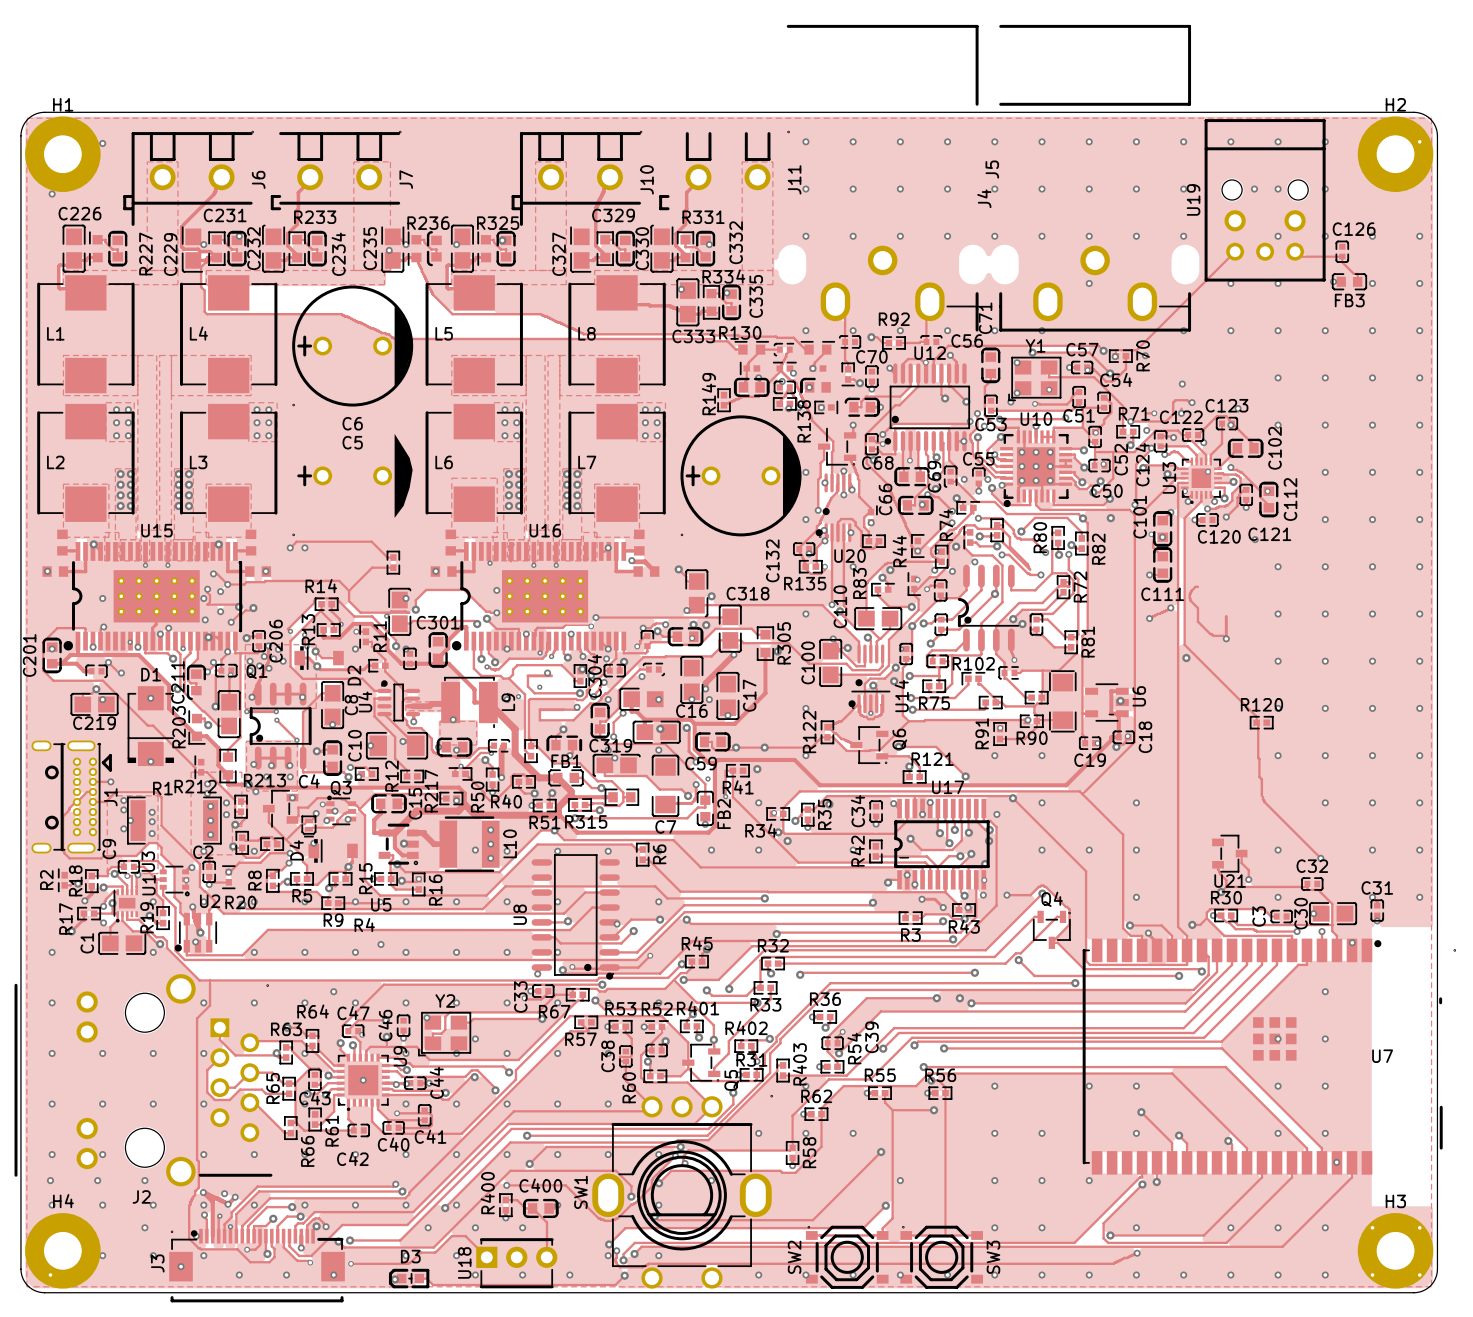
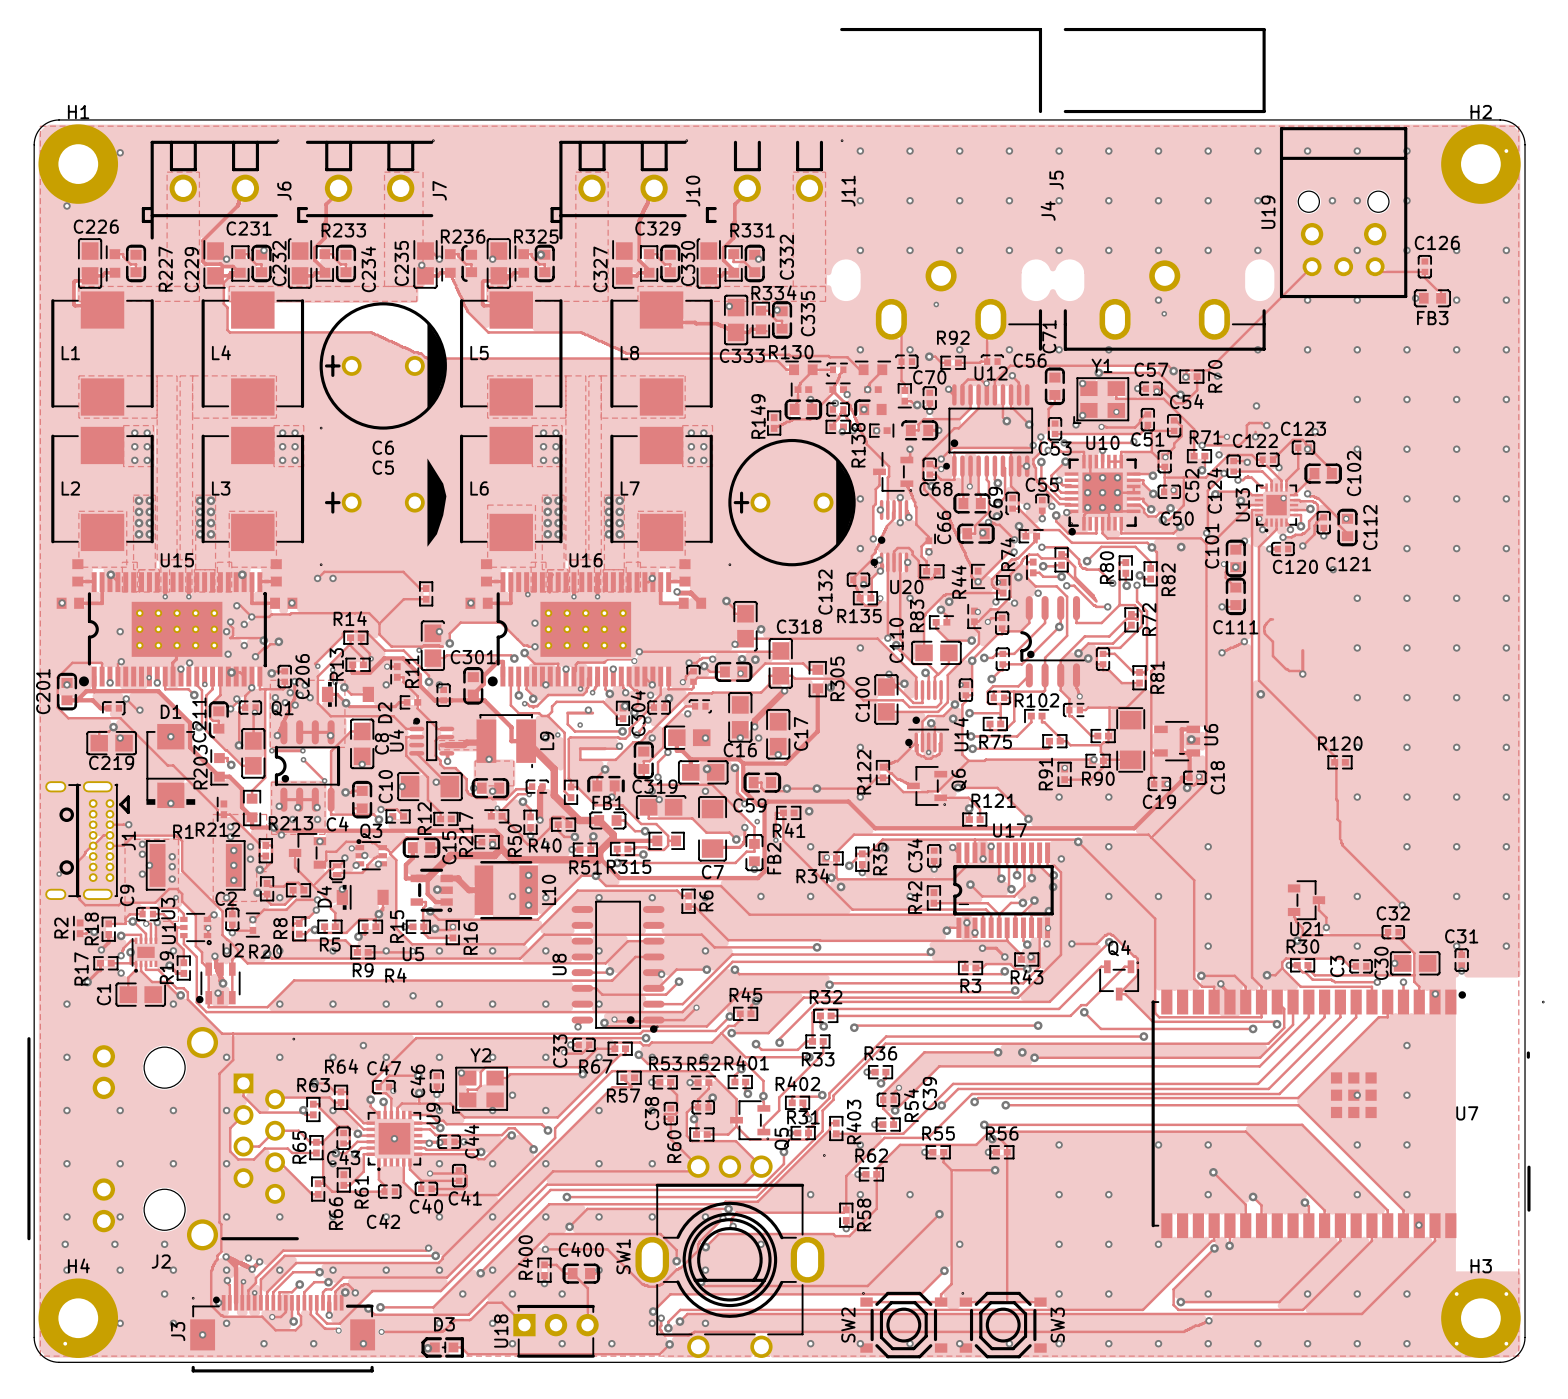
via: none -> (936, 304)
via: none -> (1164, 313)
via: none -> (59, 874)
via: none -> (175, 897)

